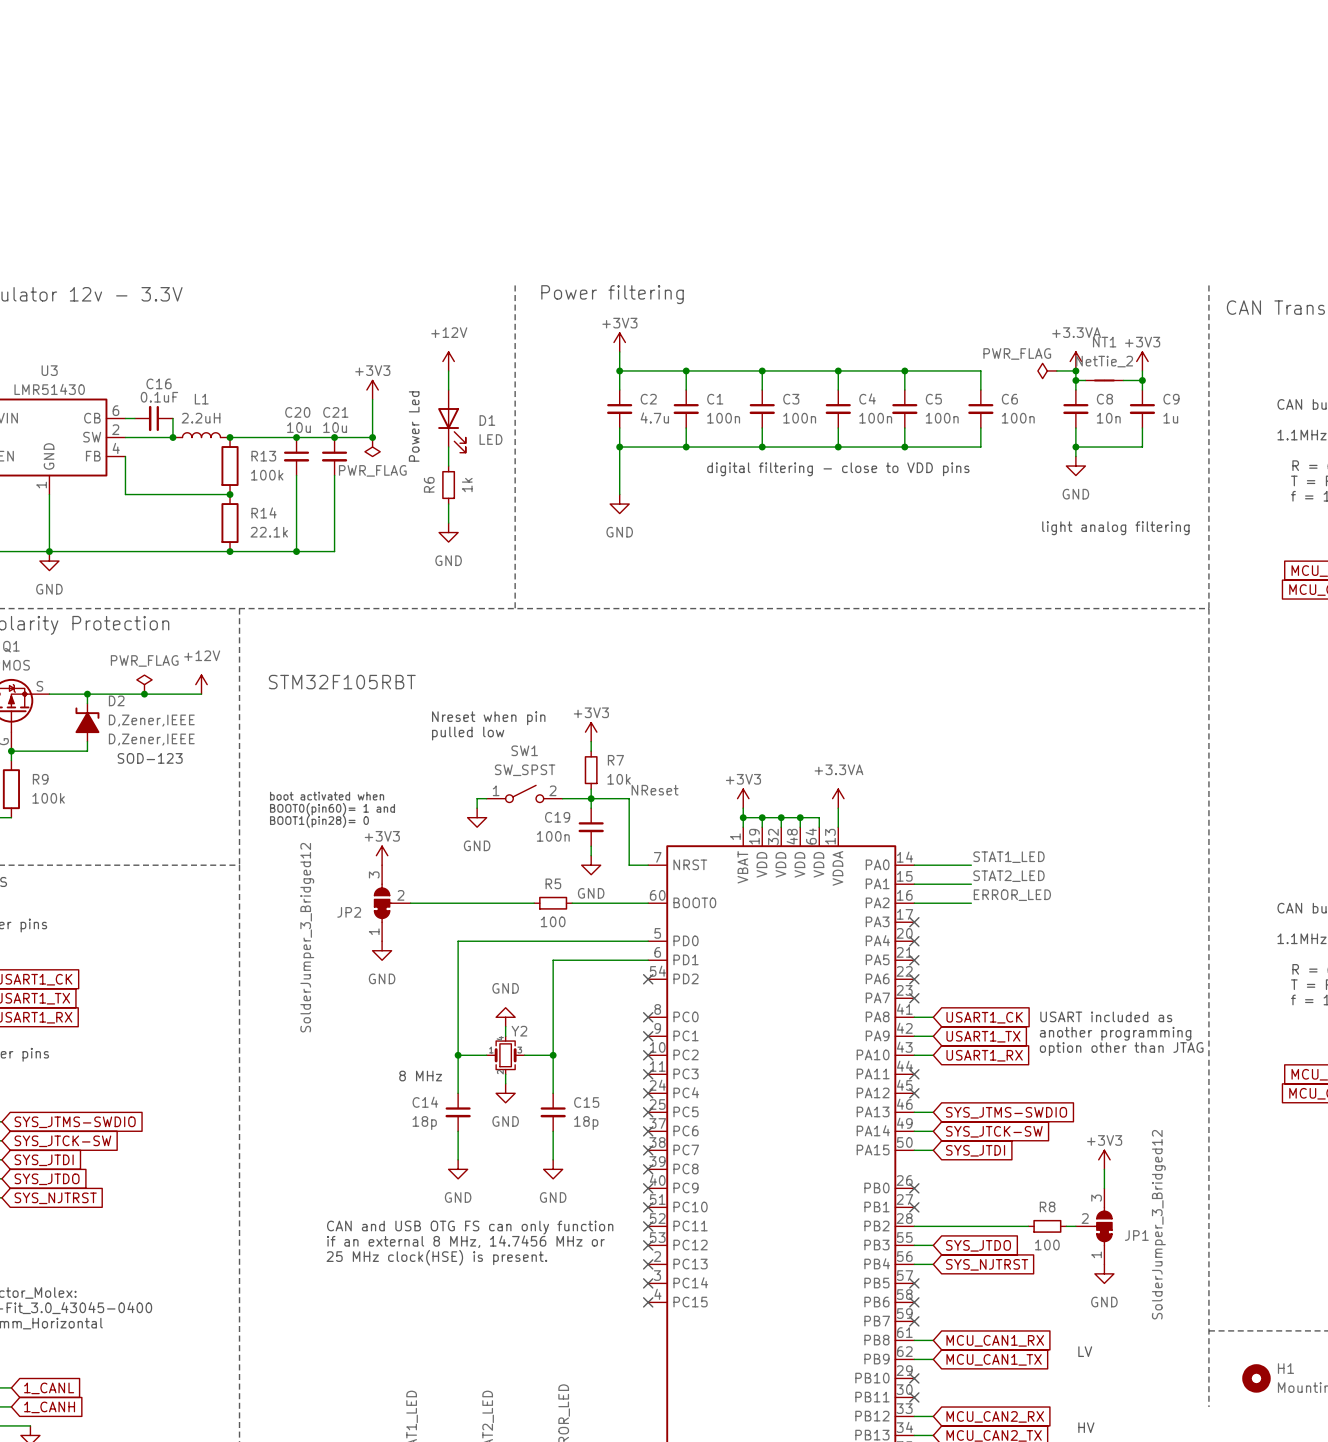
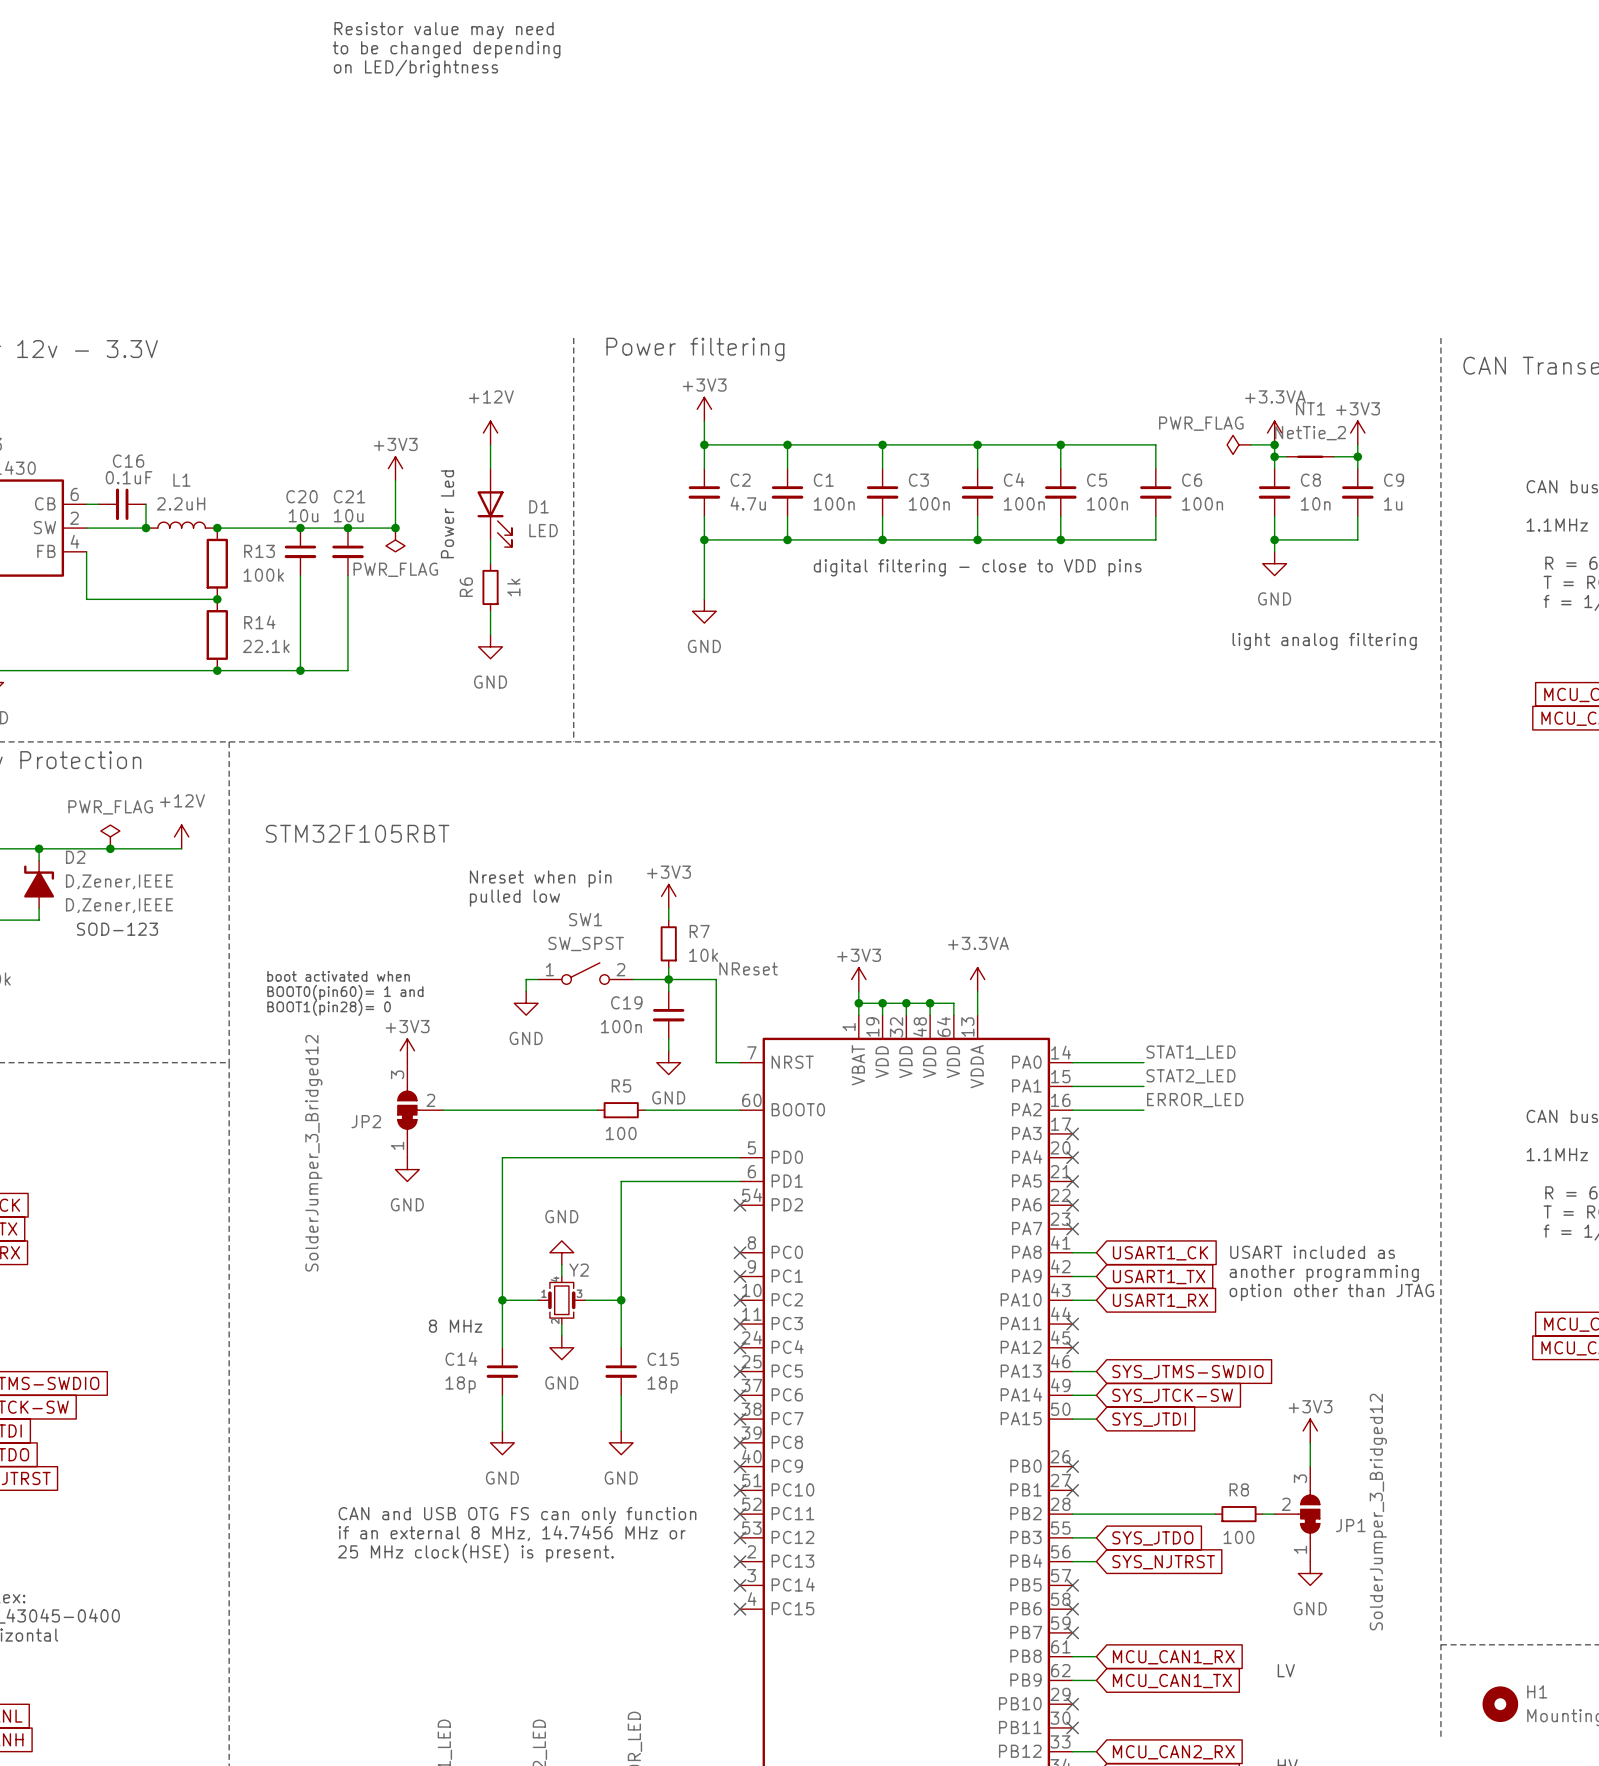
text: none -> Resistor value may need (444, 30)
text: none -> to be changed depending (446, 49)
text: none -> on LED/brightness (416, 68)

